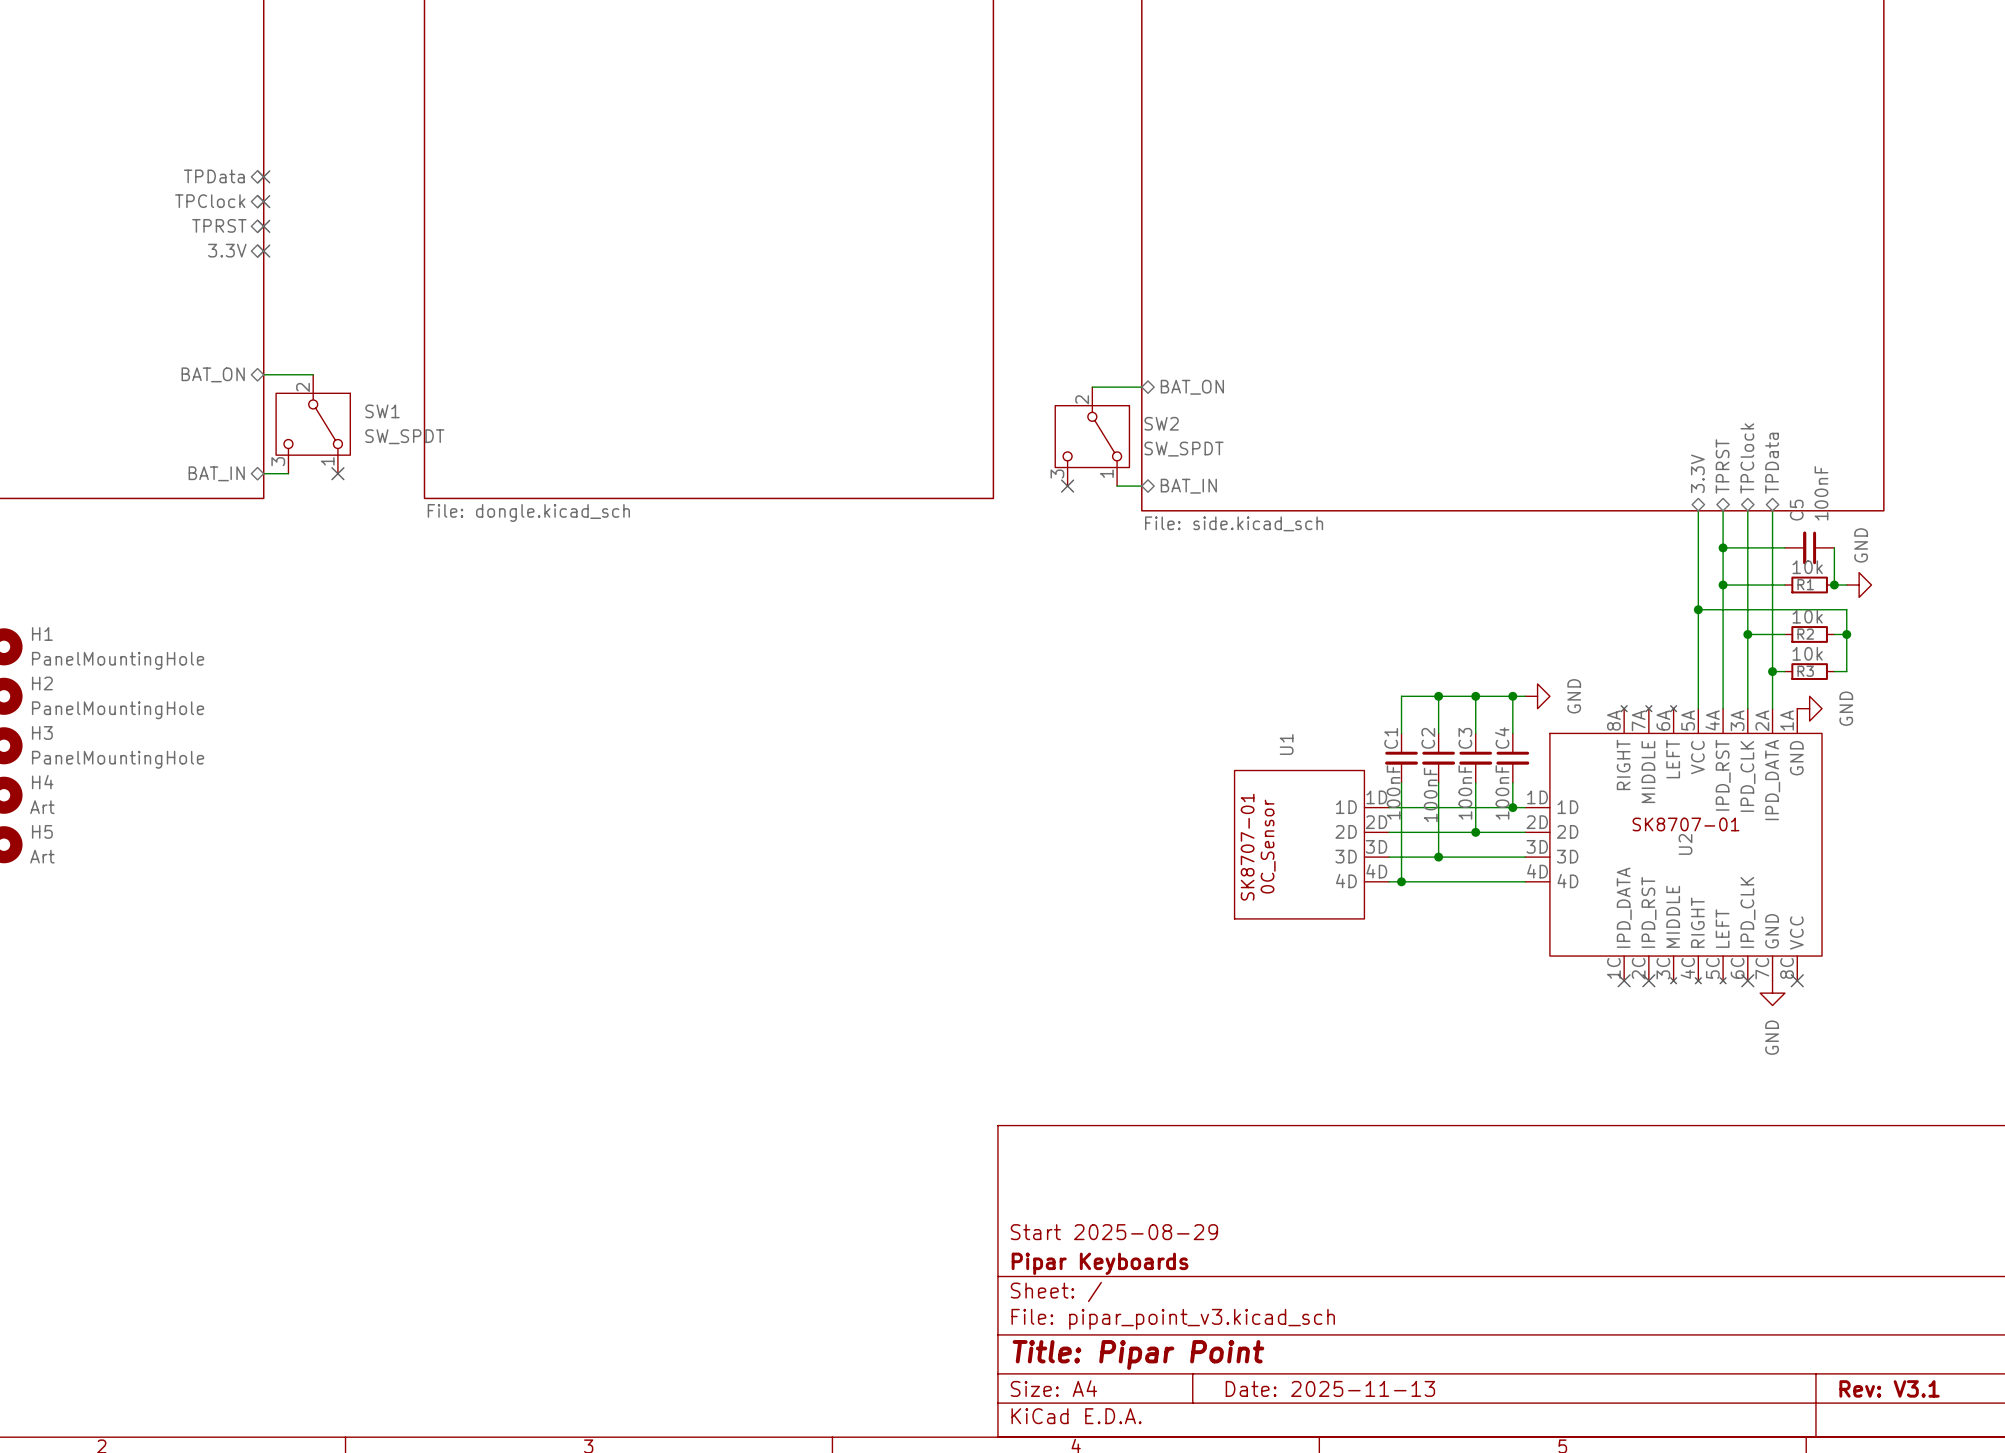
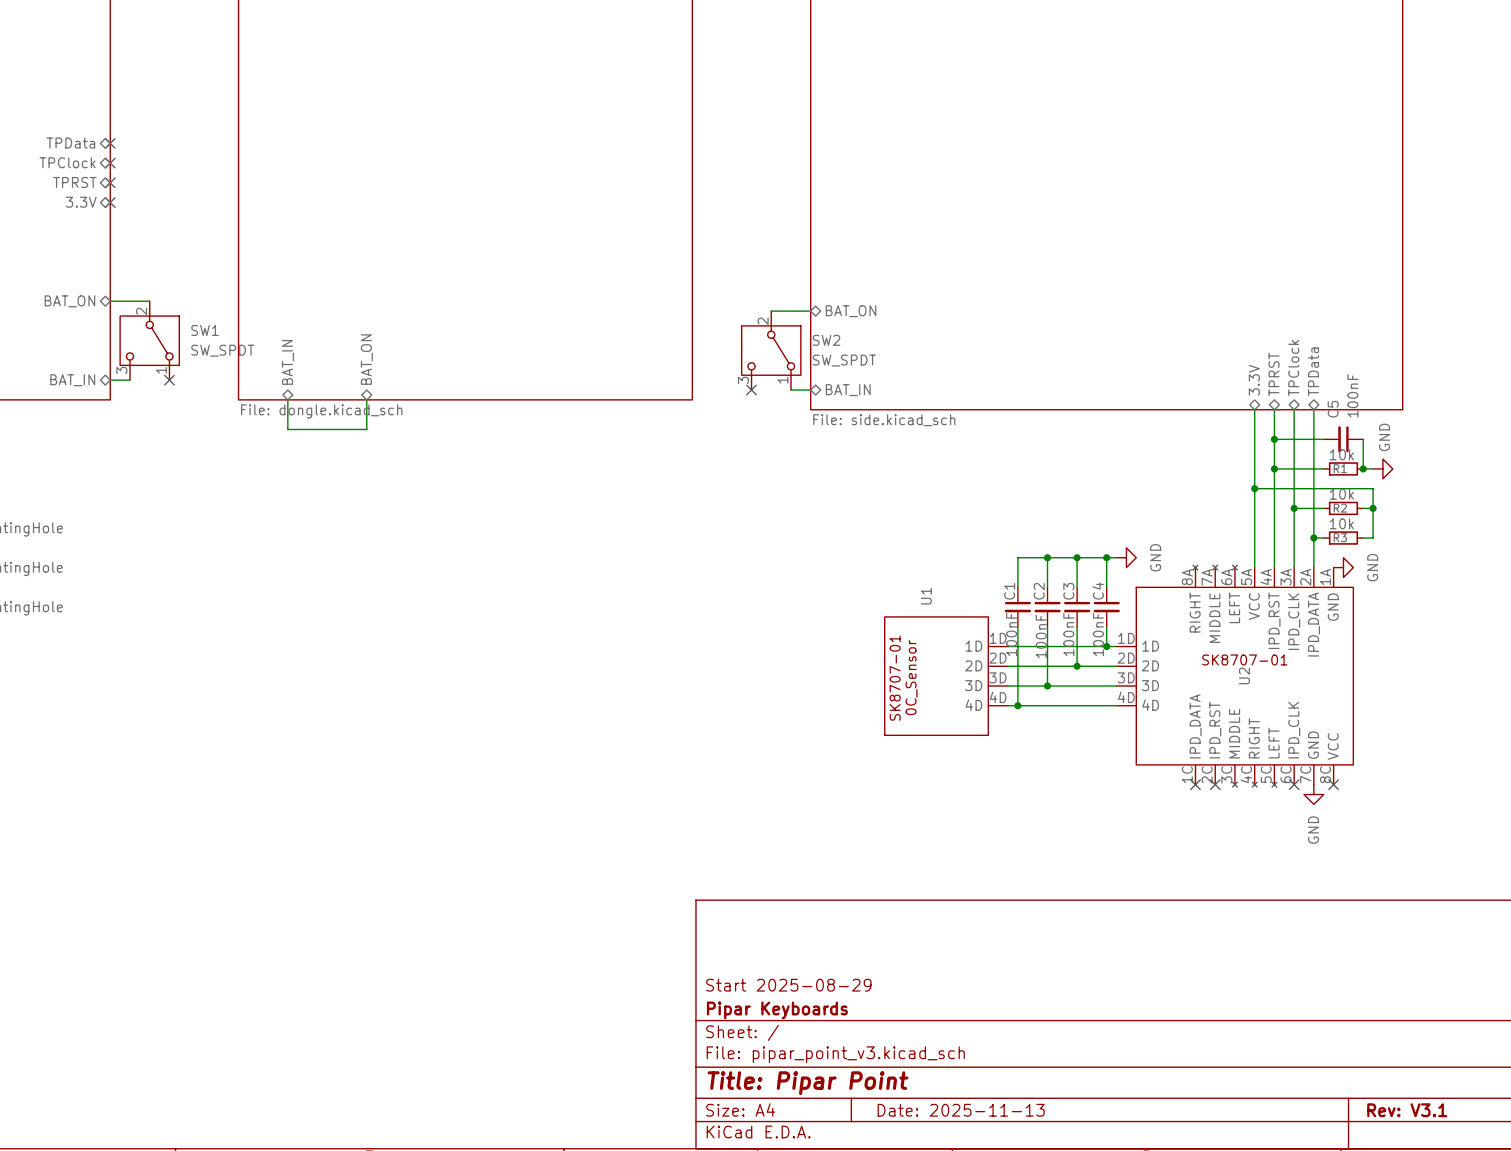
sheet pin: none -> BAT_ON (366, 359)
sheet pin: none -> BAT_IN (287, 362)
wire: none -> (287, 399) (287, 429) (366, 429) (366, 399)

